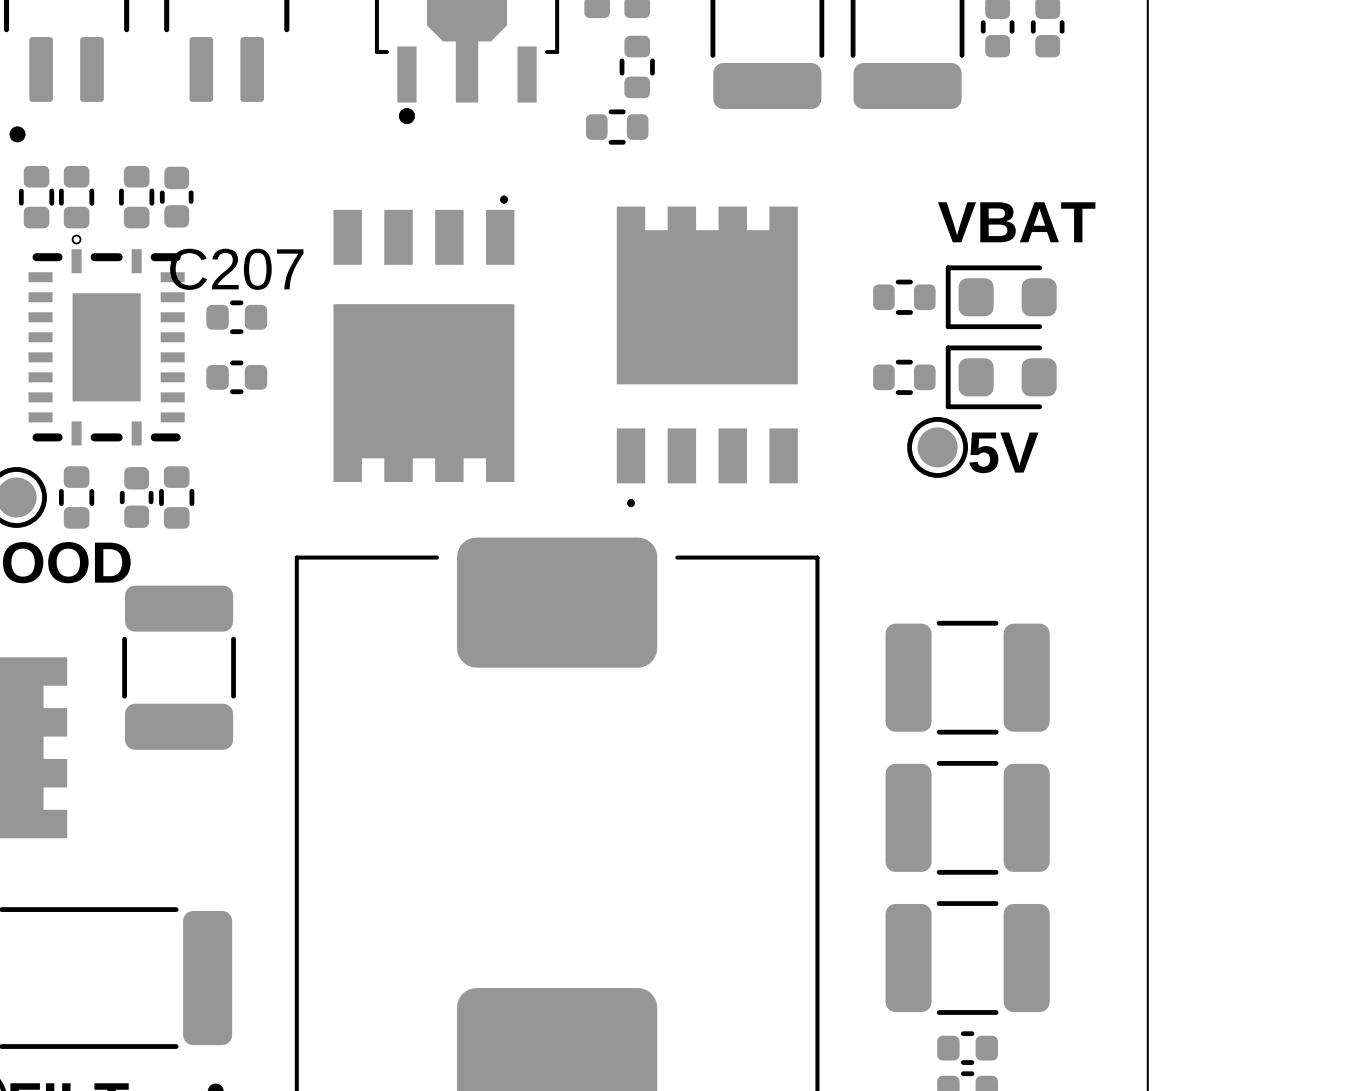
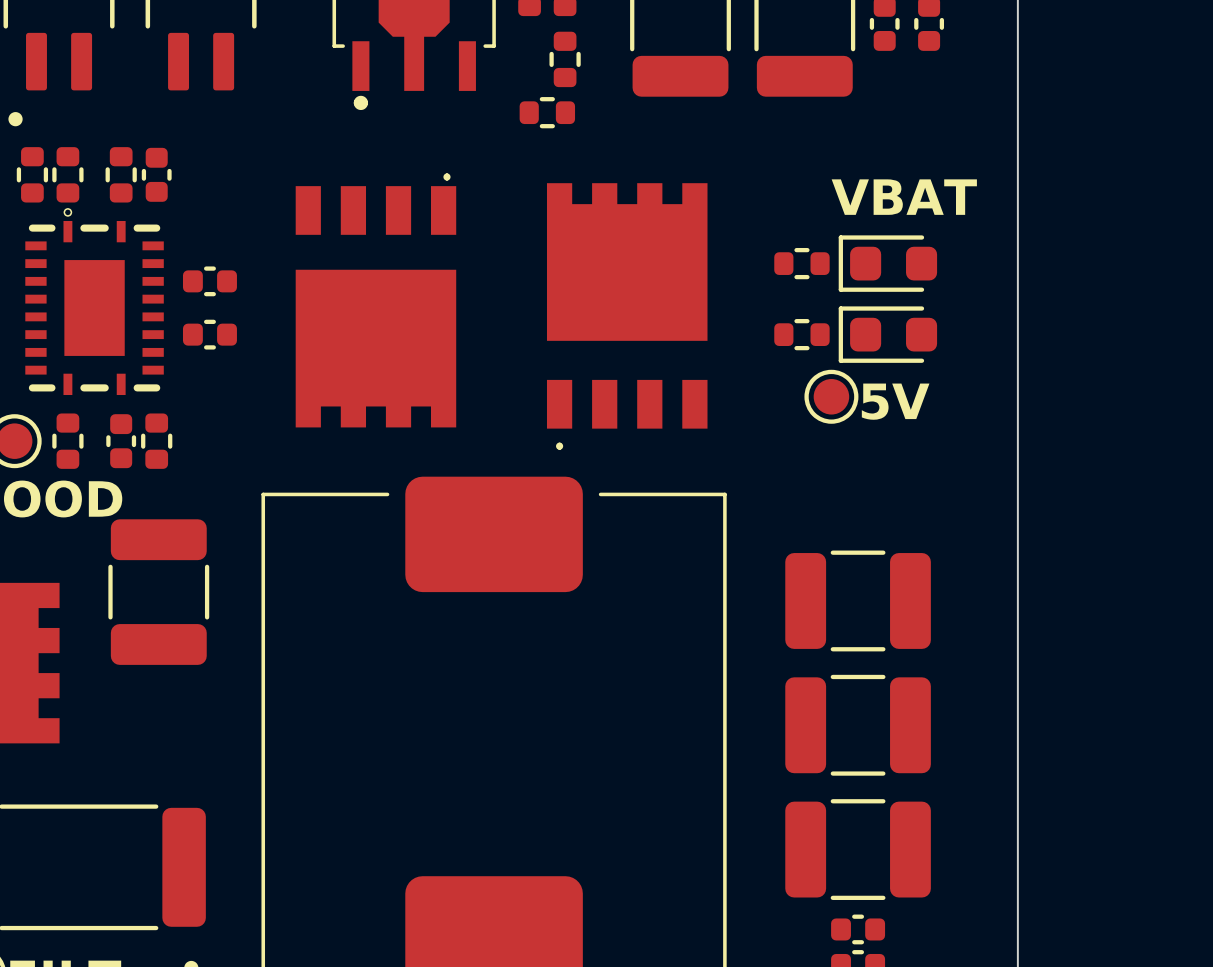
C207 name: C207 (236, 269) -> none

